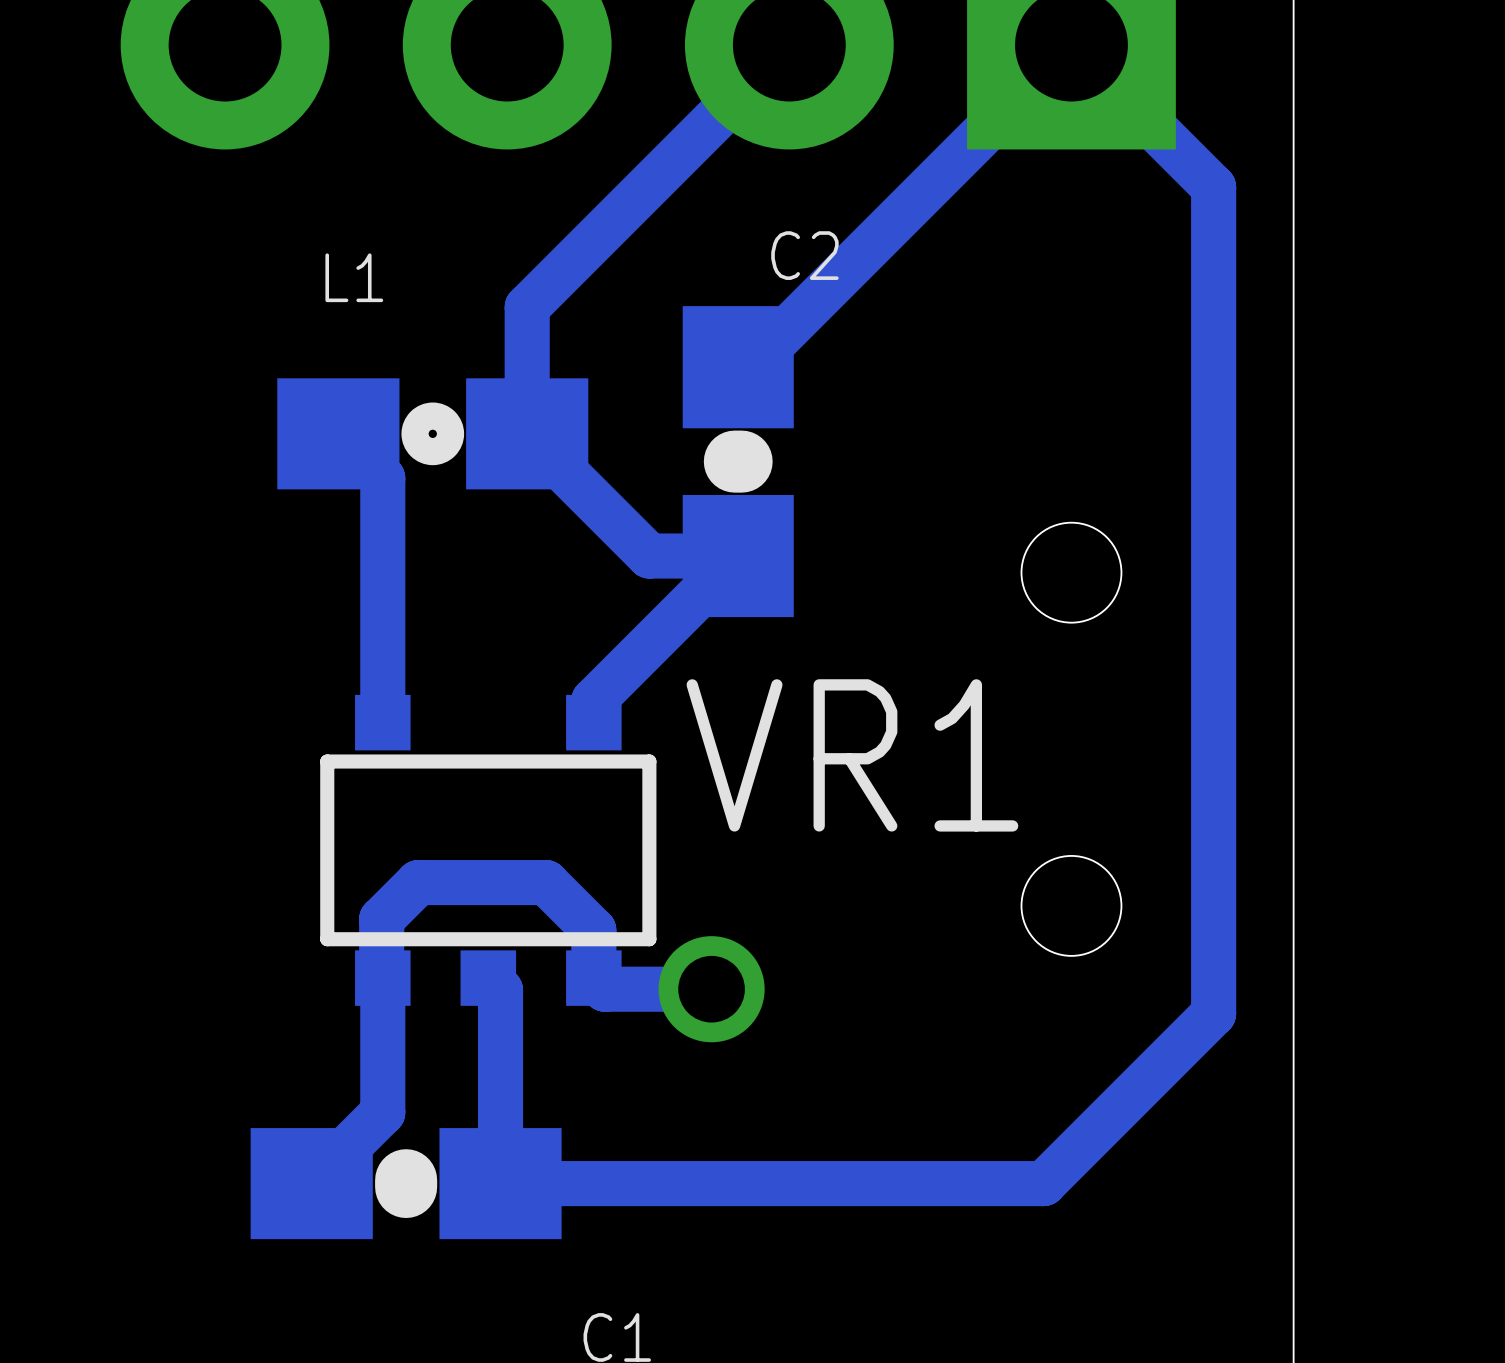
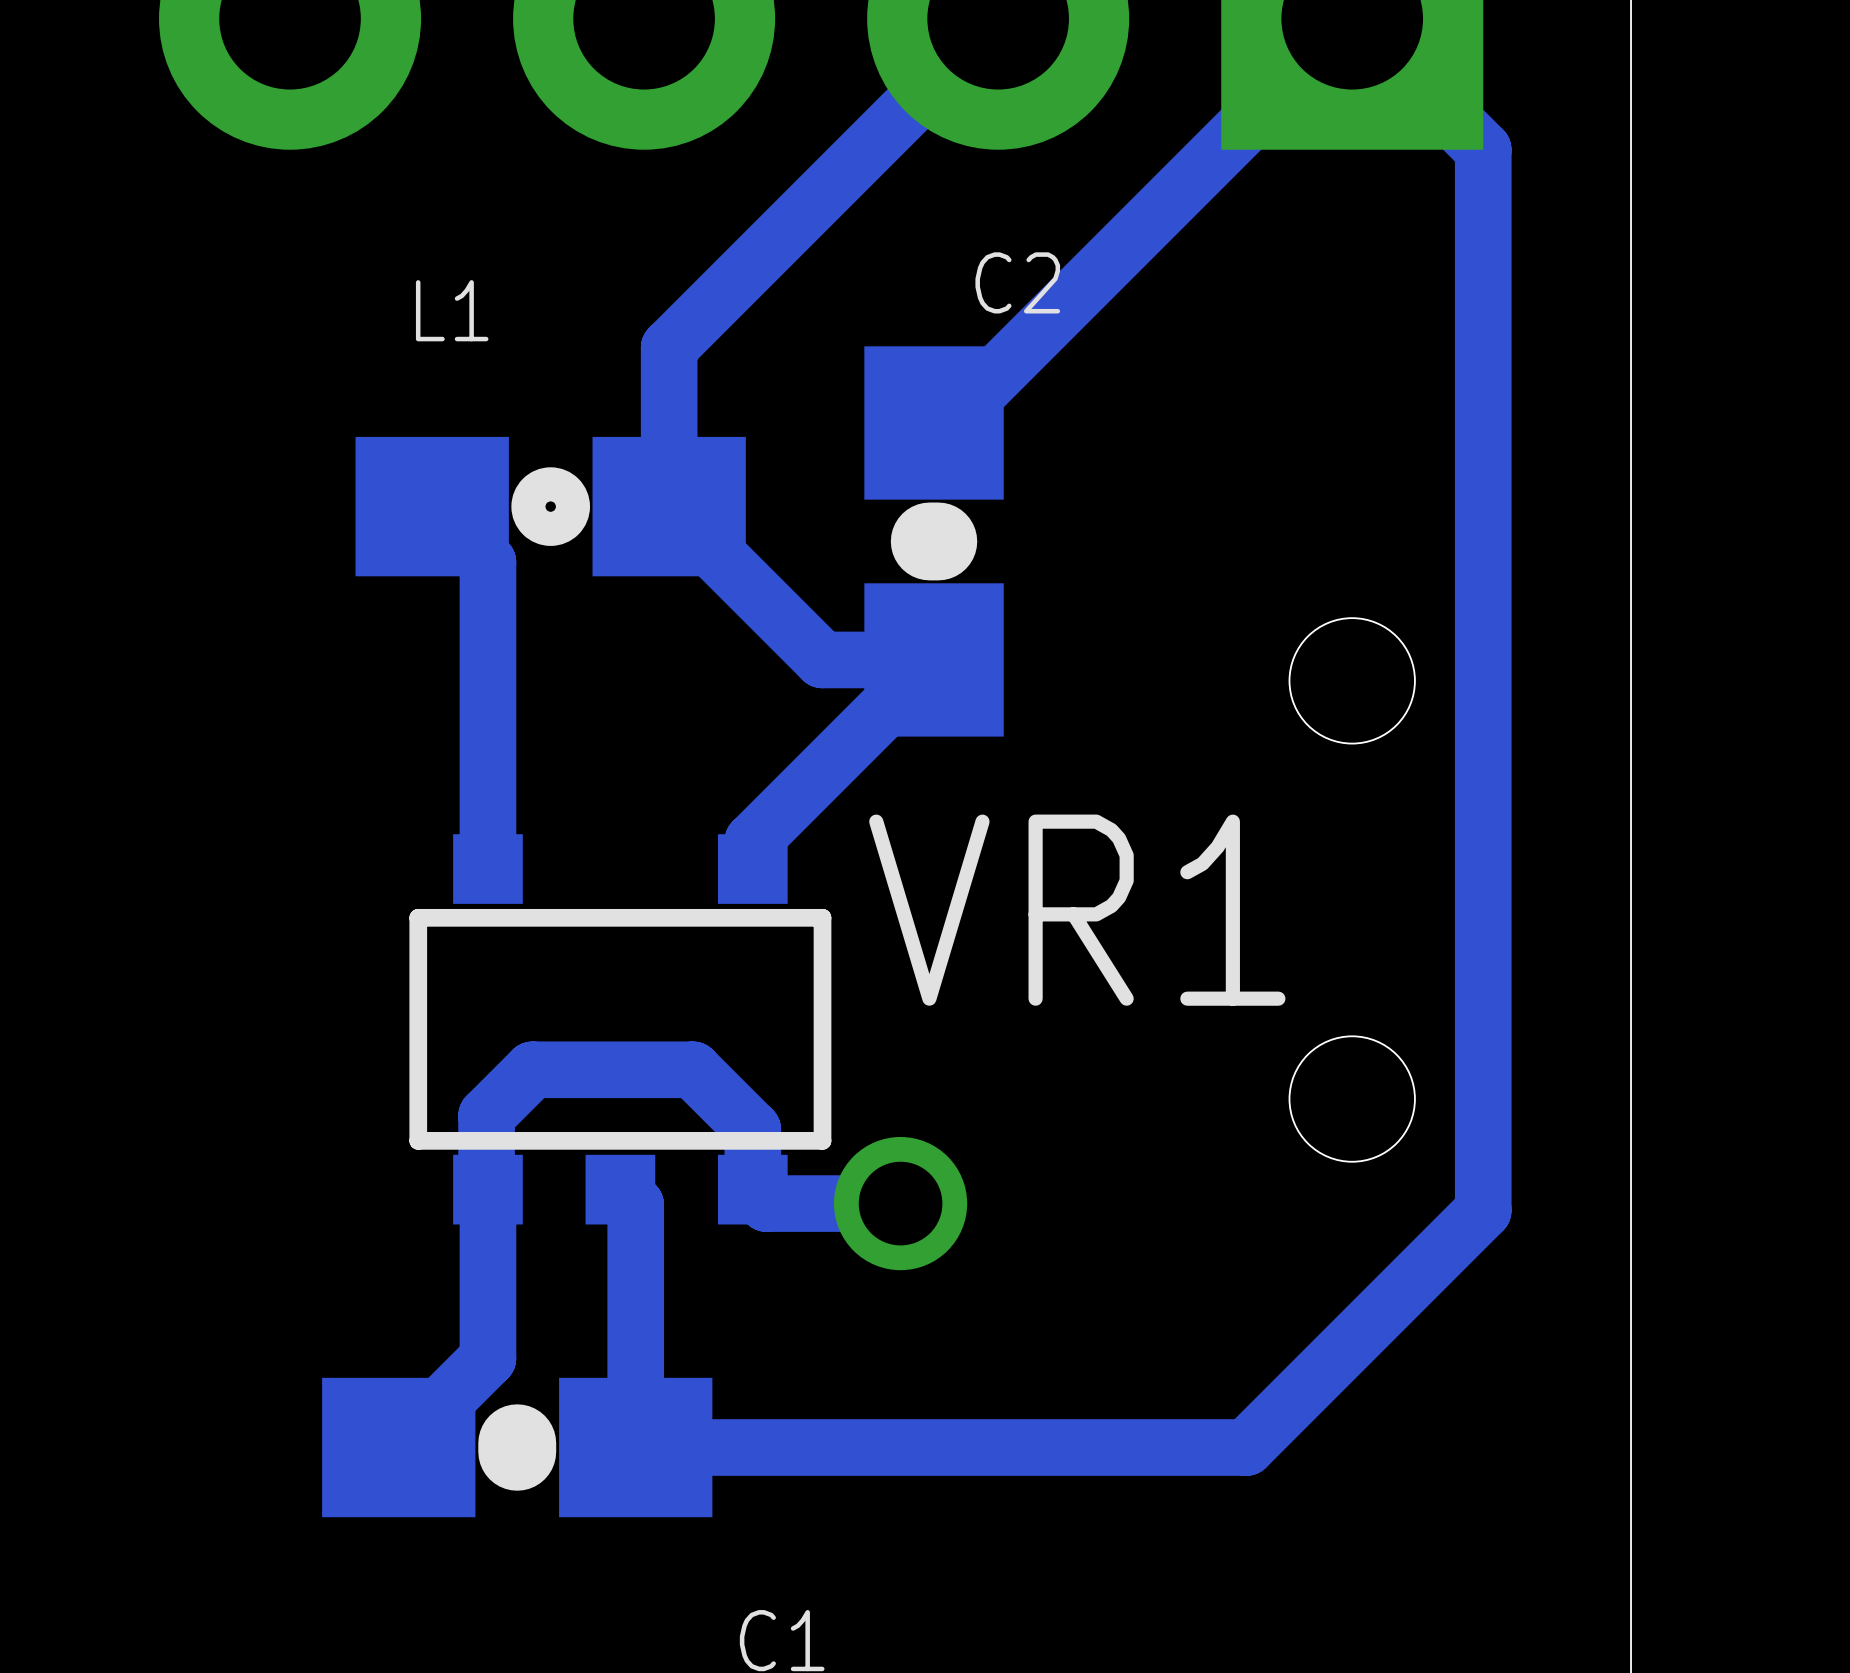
track: (1175, 149) (1213, 187) (1213, 1013) (1043, 1183) (987, 1183) -> (1483, 149) (1483, 1210) (1246, 1447)

